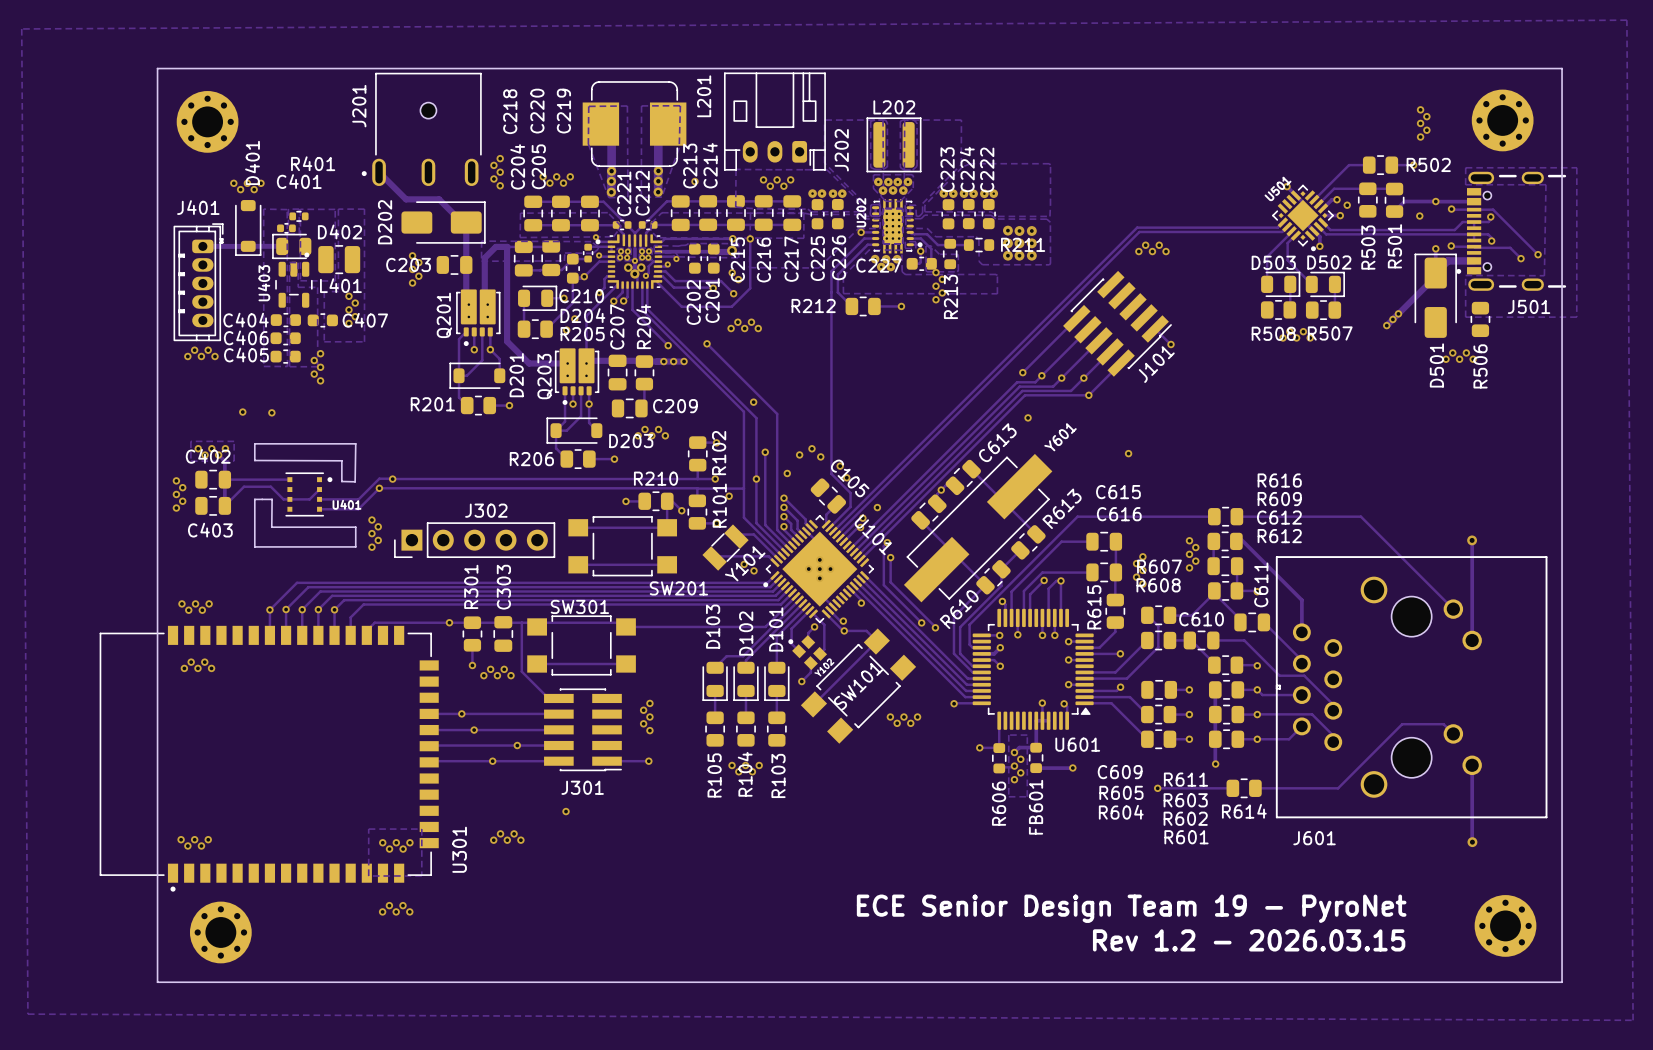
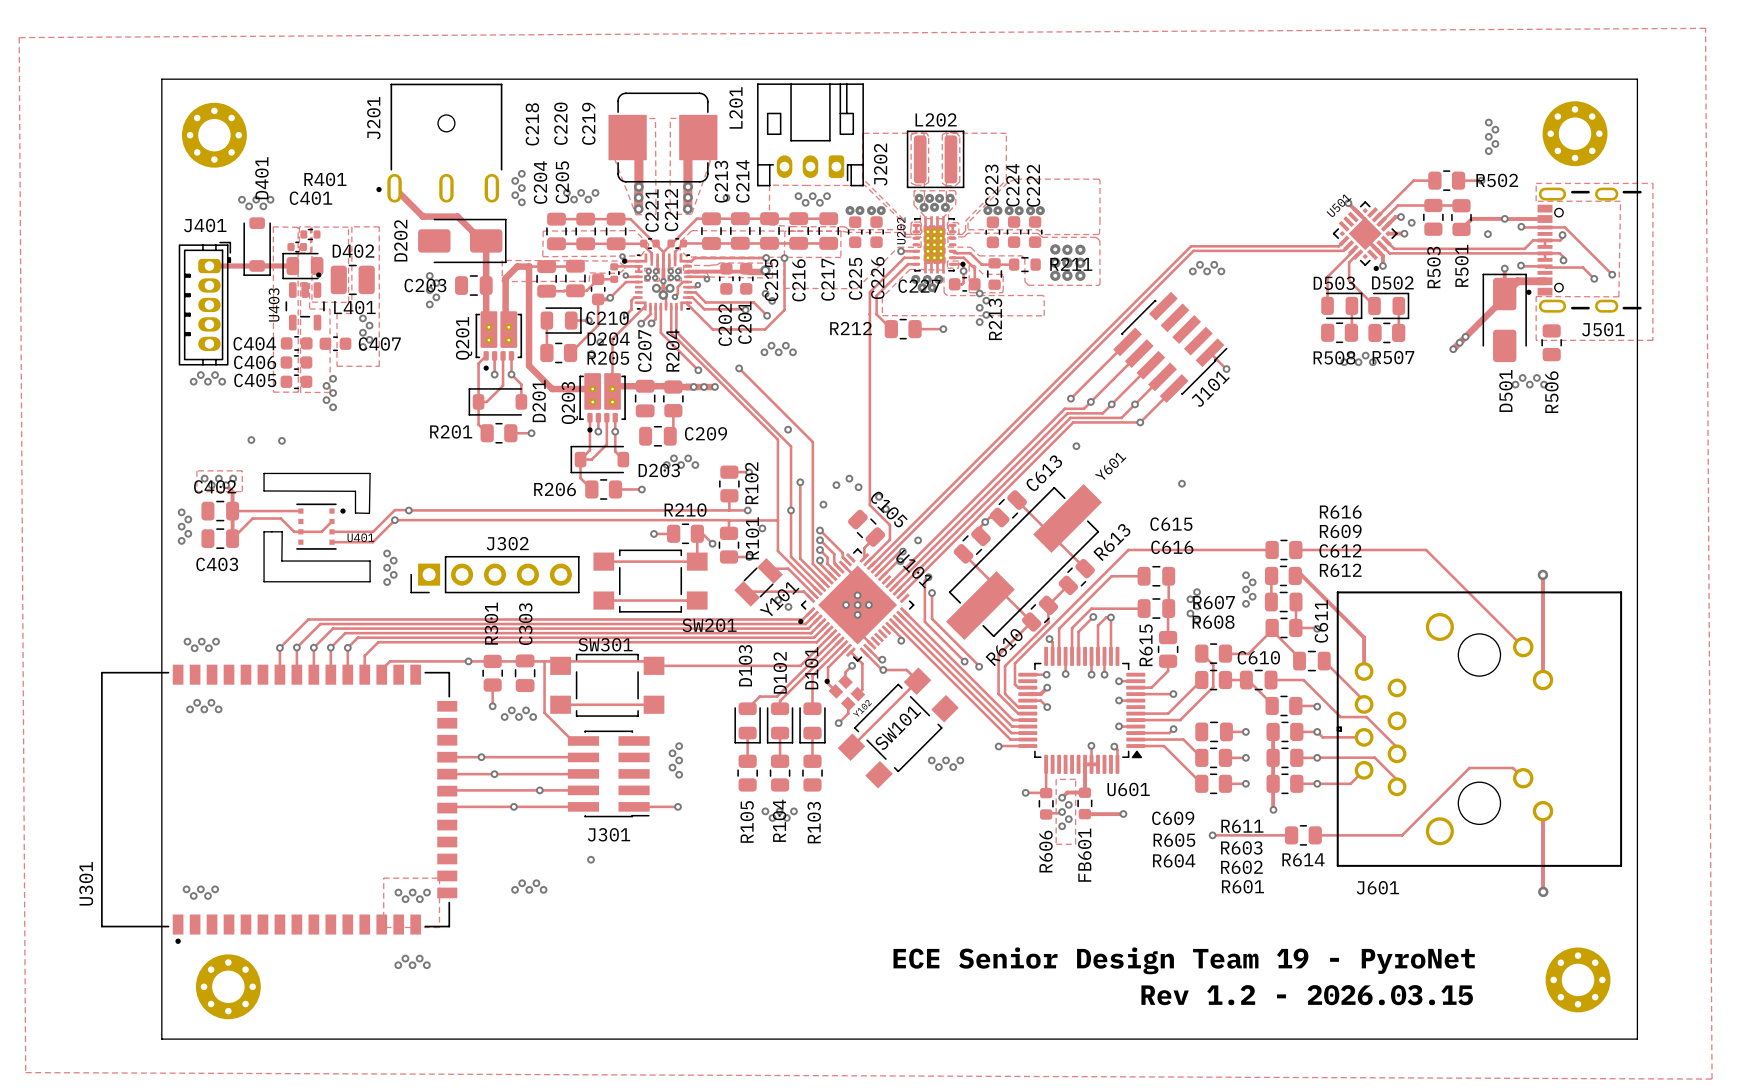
U301 name position: U301 (459, 849) -> U301 (86, 883)

